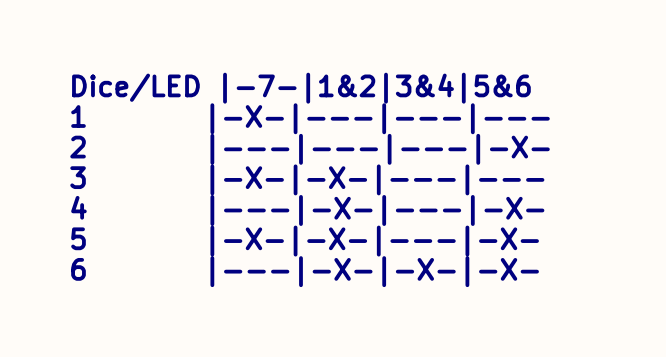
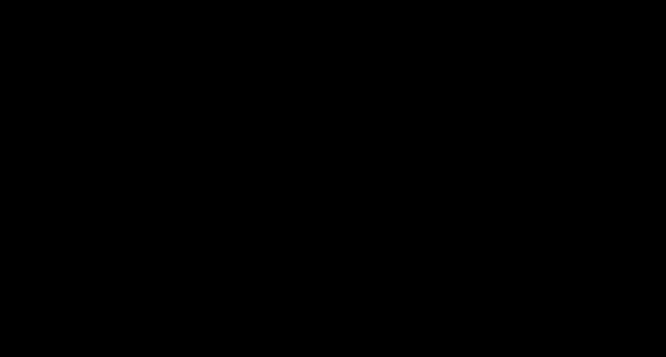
text: Dice/LED |-7-|1&2|3&4|5&6 (301, 88) -> none
text: 1 |-X-|---|---|--- (310, 118) -> none
text: 2 |---|---|---|-X- (310, 149) -> none
text: 3 |-X-|-X-|---|--- (307, 179) -> none
text: 4 |---|-X-|---|-X- (307, 210) -> none
text: 5 |-X-|-X-|---|-X- (305, 241) -> none
text: 6 |---|-X-|-X-|-X- (305, 271) -> none

